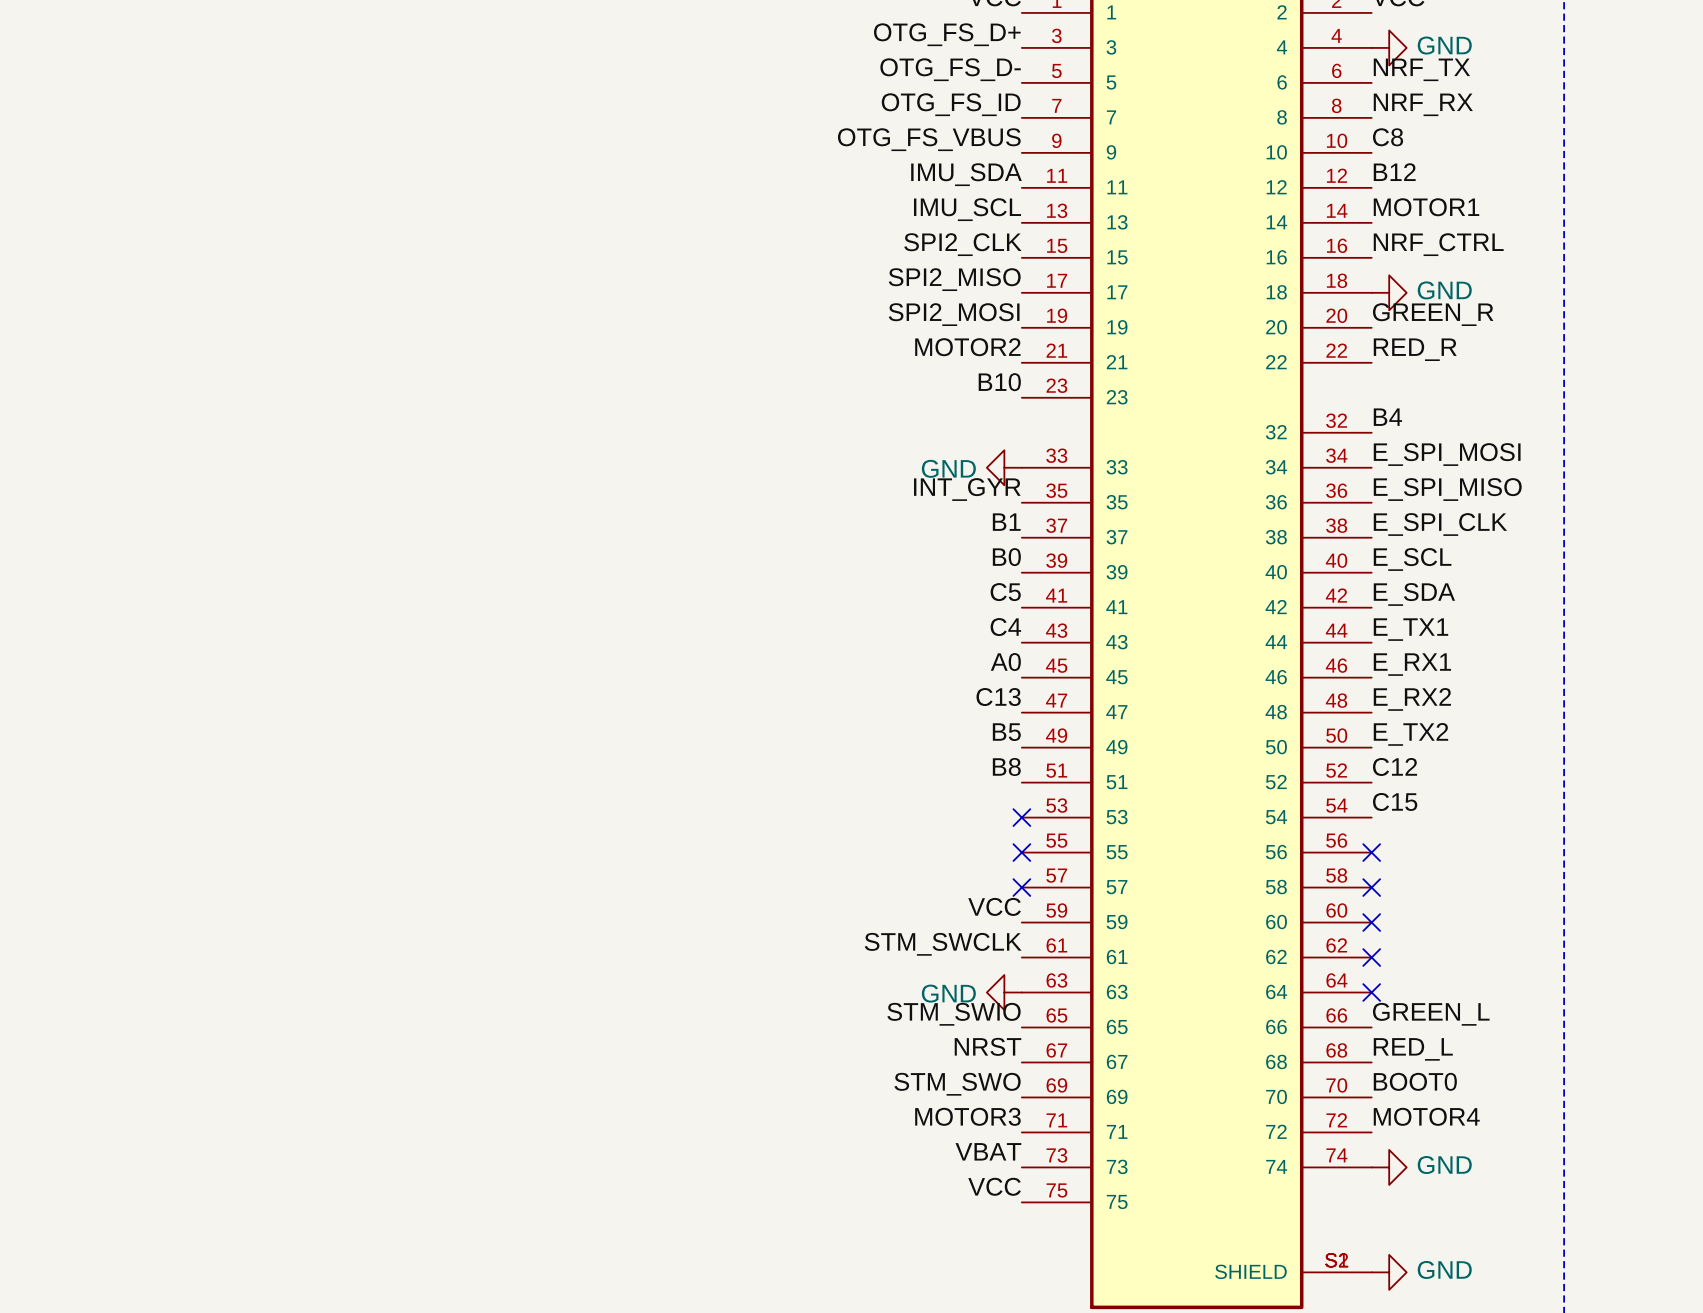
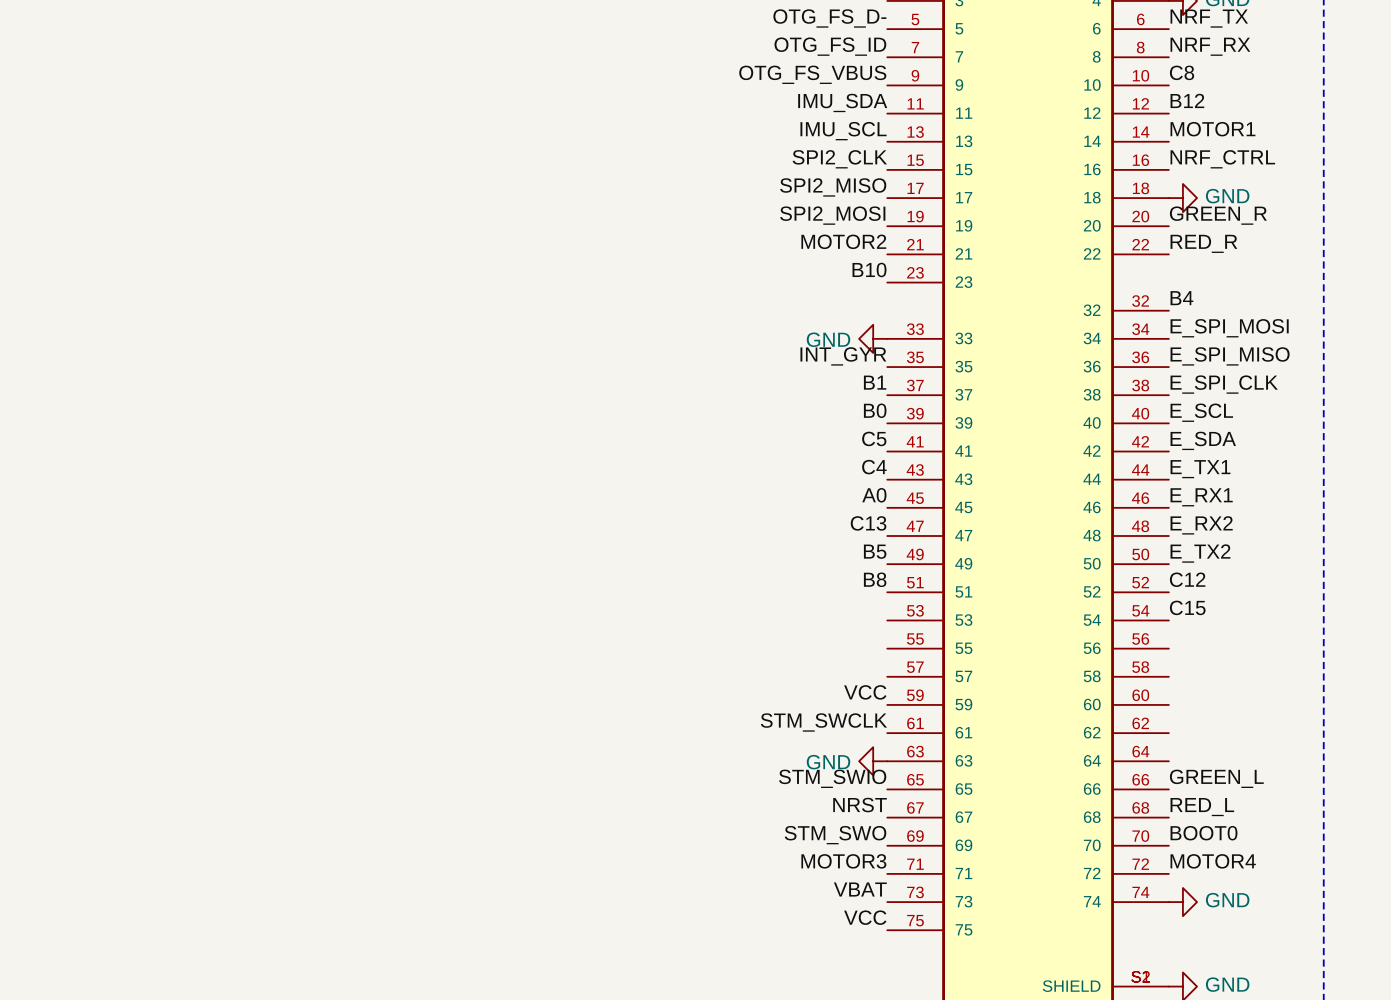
no-connect mark: (1021, 817) -> none
no-connect mark: (1021, 852) -> none
no-connect mark: (1371, 852) -> none
no-connect mark: (1021, 887) -> none
no-connect mark: (1371, 887) -> none
no-connect mark: (1371, 922) -> none
no-connect mark: (1371, 957) -> none
no-connect mark: (1371, 992) -> none

